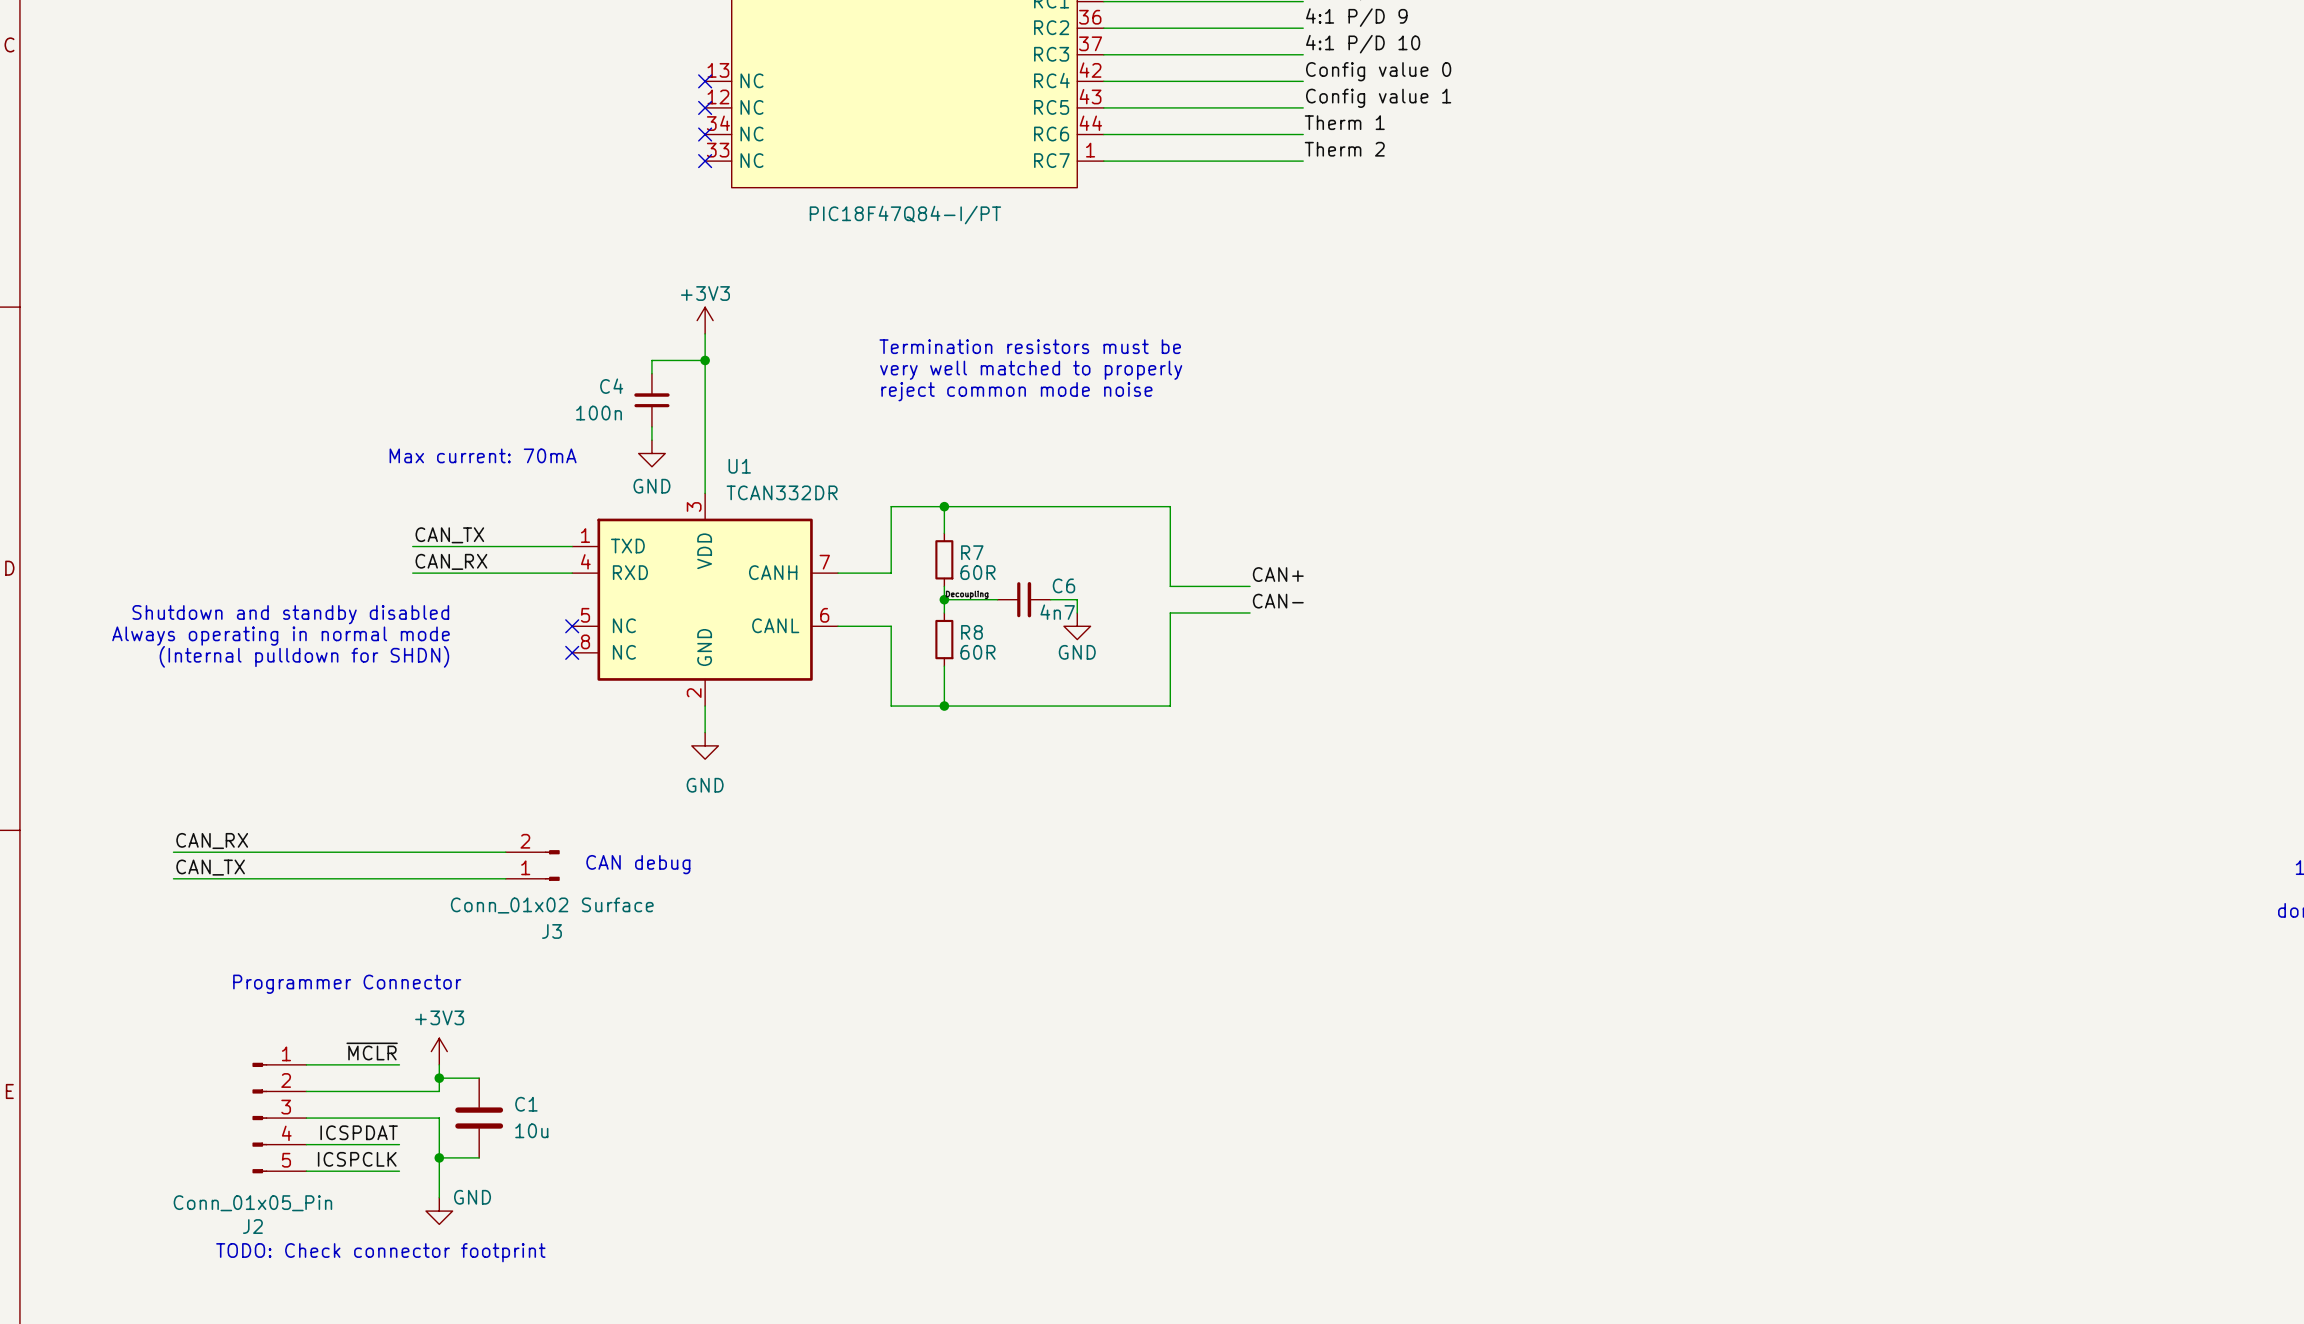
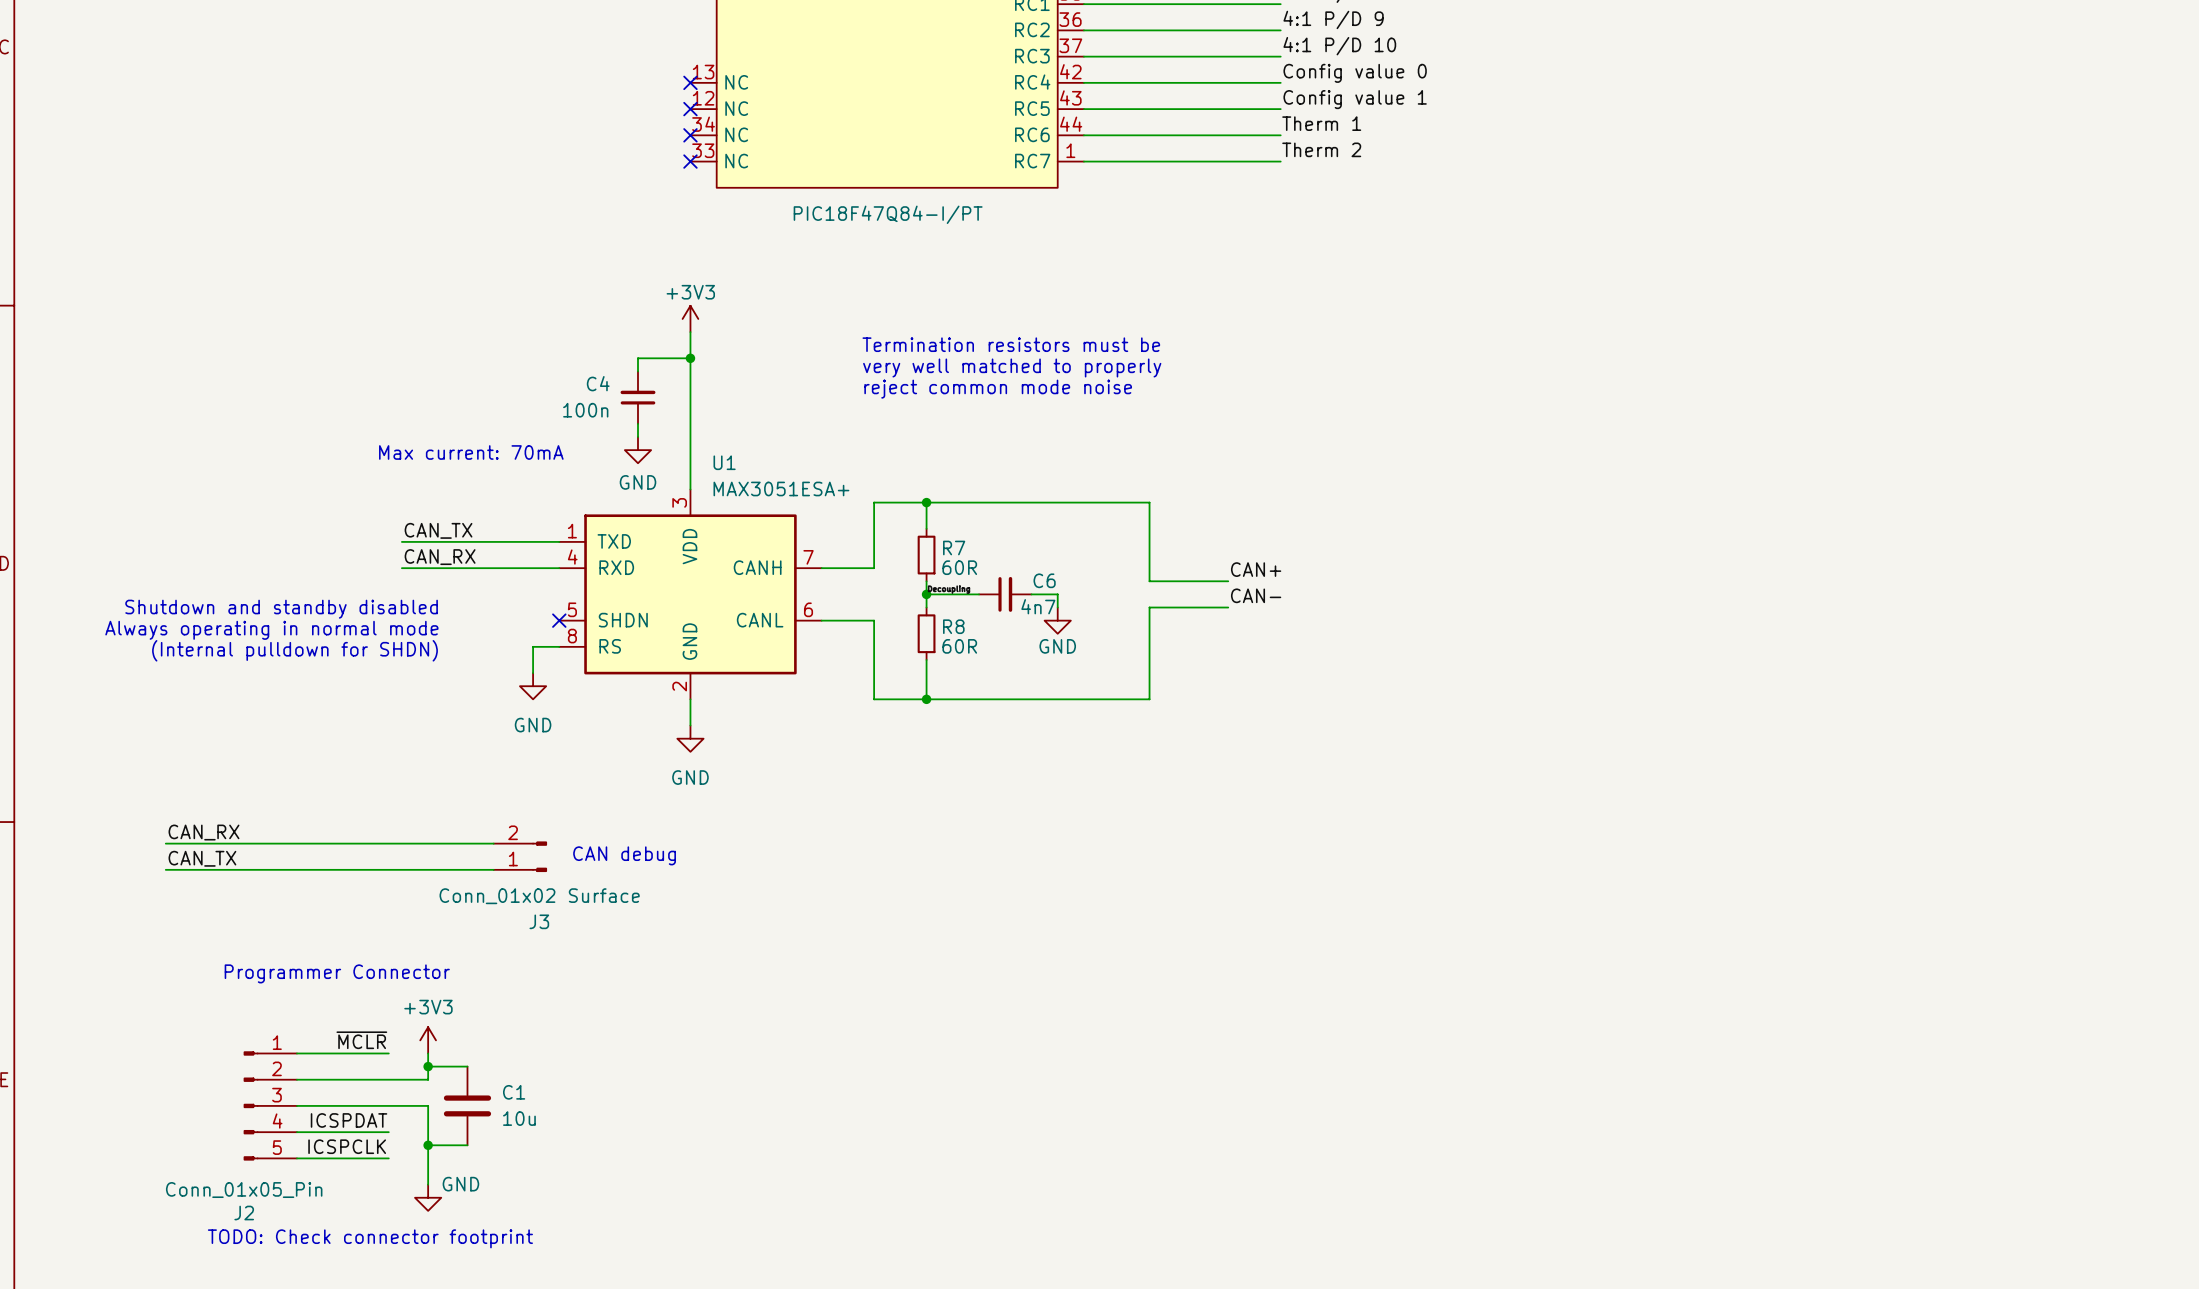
U1 value: TCAN332DR (782, 492) -> MAX3051ESA+ (781, 488)
U1 pin name: NC (624, 625) -> SHDN (623, 620)
wire: none -> (559, 646) (533, 646) (533, 673)
no-connect mark: (572, 652) -> none
U1 pin name: NC (624, 652) -> RS (610, 646)
power symbol: none -> GND (533, 686)

